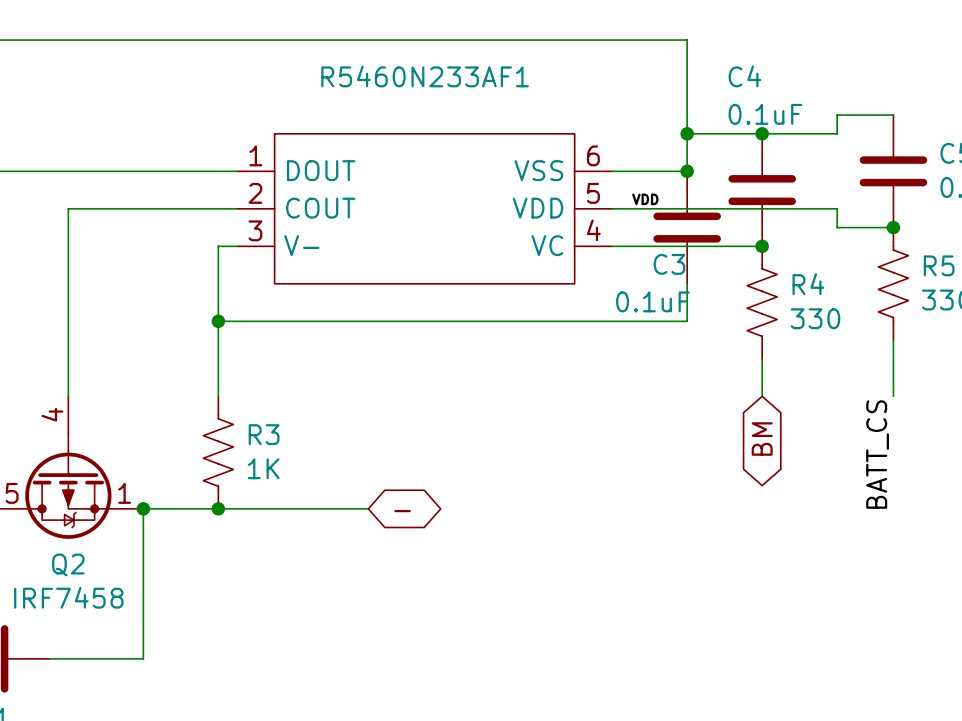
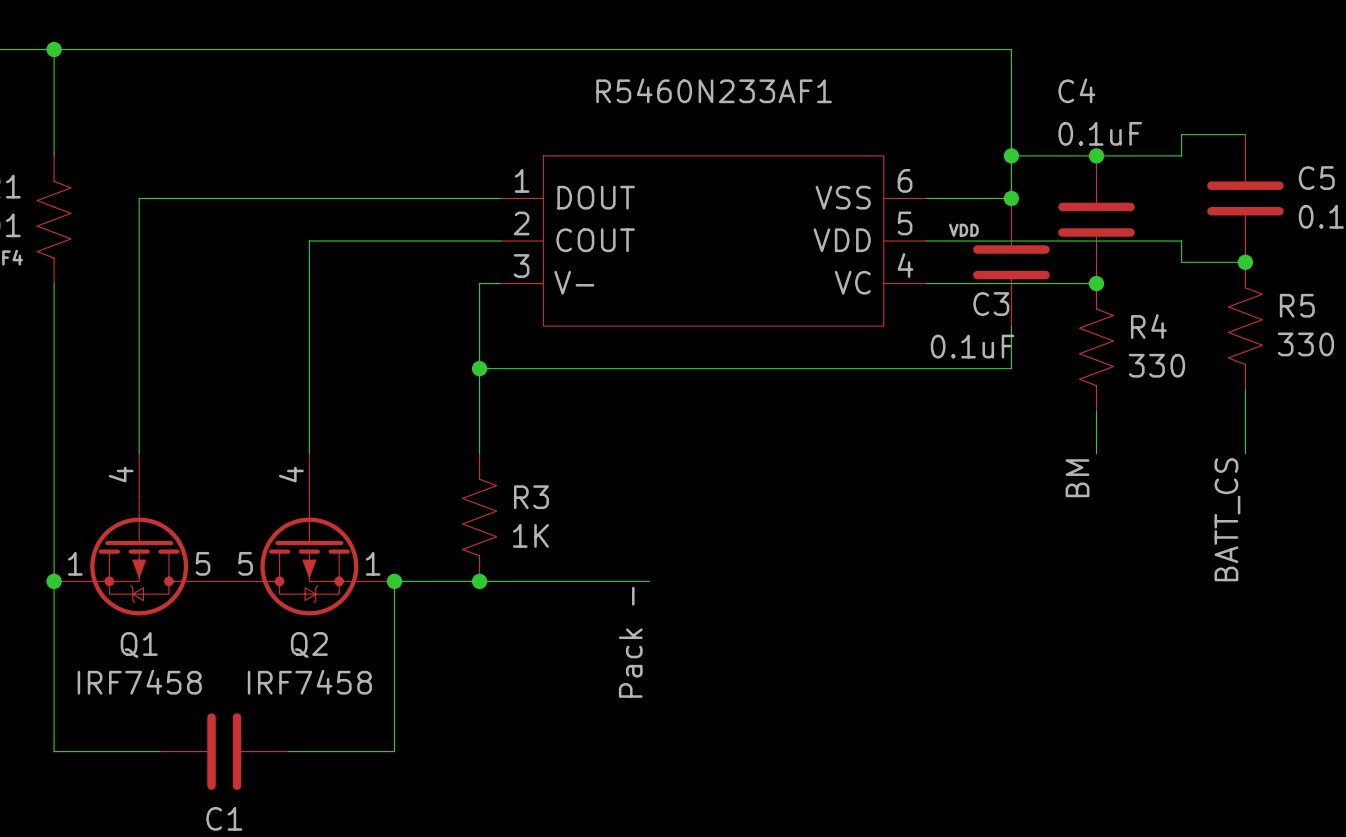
label: none -> BM (1077, 478)
global label: BM (762, 439) -> none
global label: - (402, 511) -> none
label: none -> Pack - (630, 642)

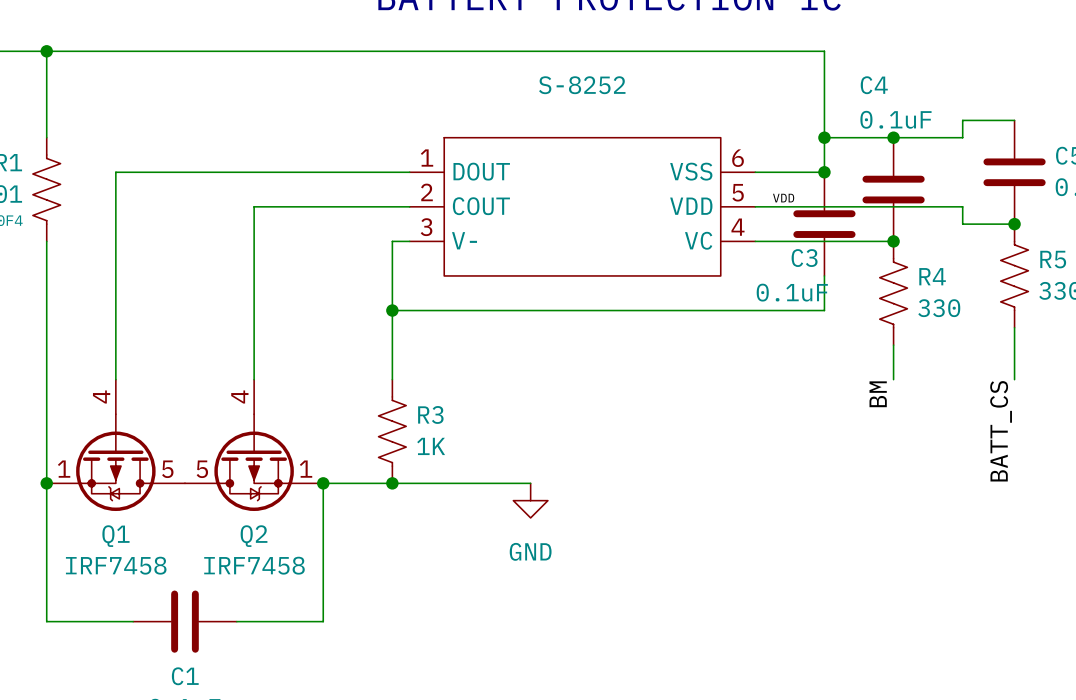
R5460N233AF1 name: R5460N233AF1 (714, 90) -> S-8252 (582, 85)
power symbol: none -> GND (530, 500)
label: Pack - (630, 642) -> none

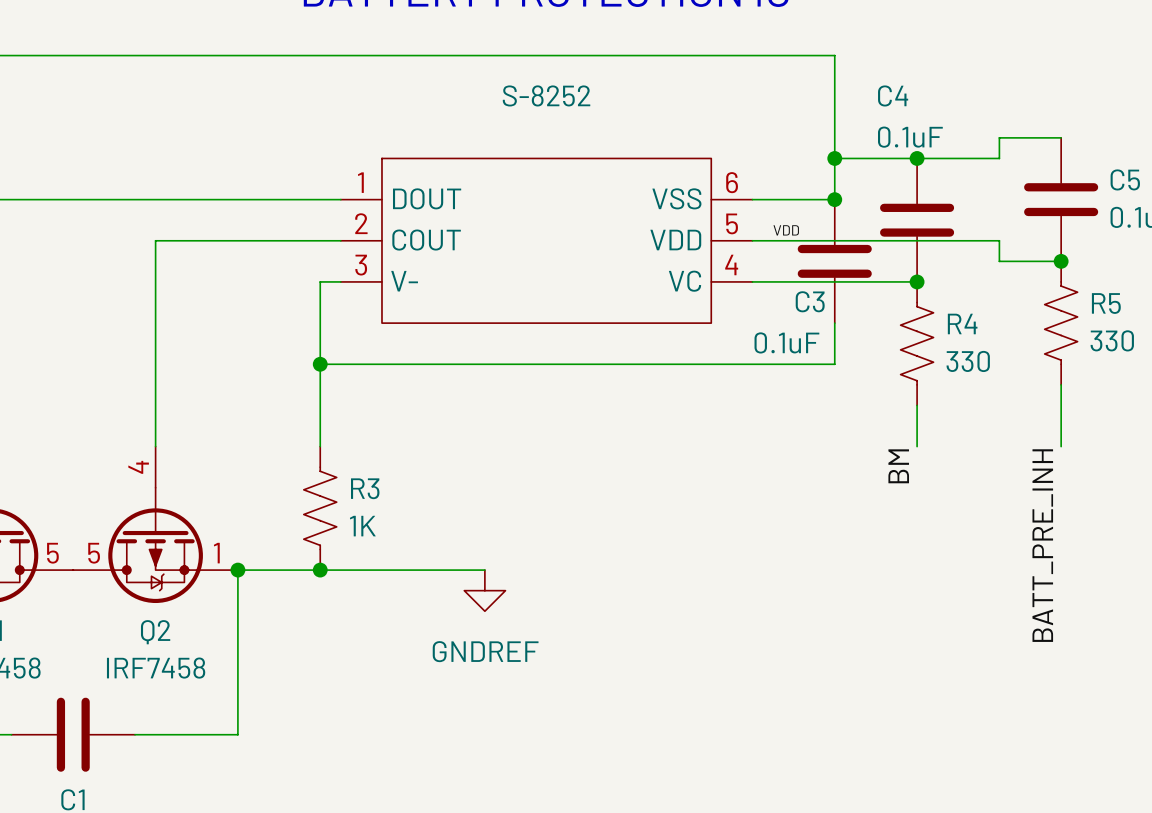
label: BATT_CS (1001, 431) -> BATT_PRE_INH (1042, 545)
power symbol: GND (530, 500) -> GNDREF (484, 590)

